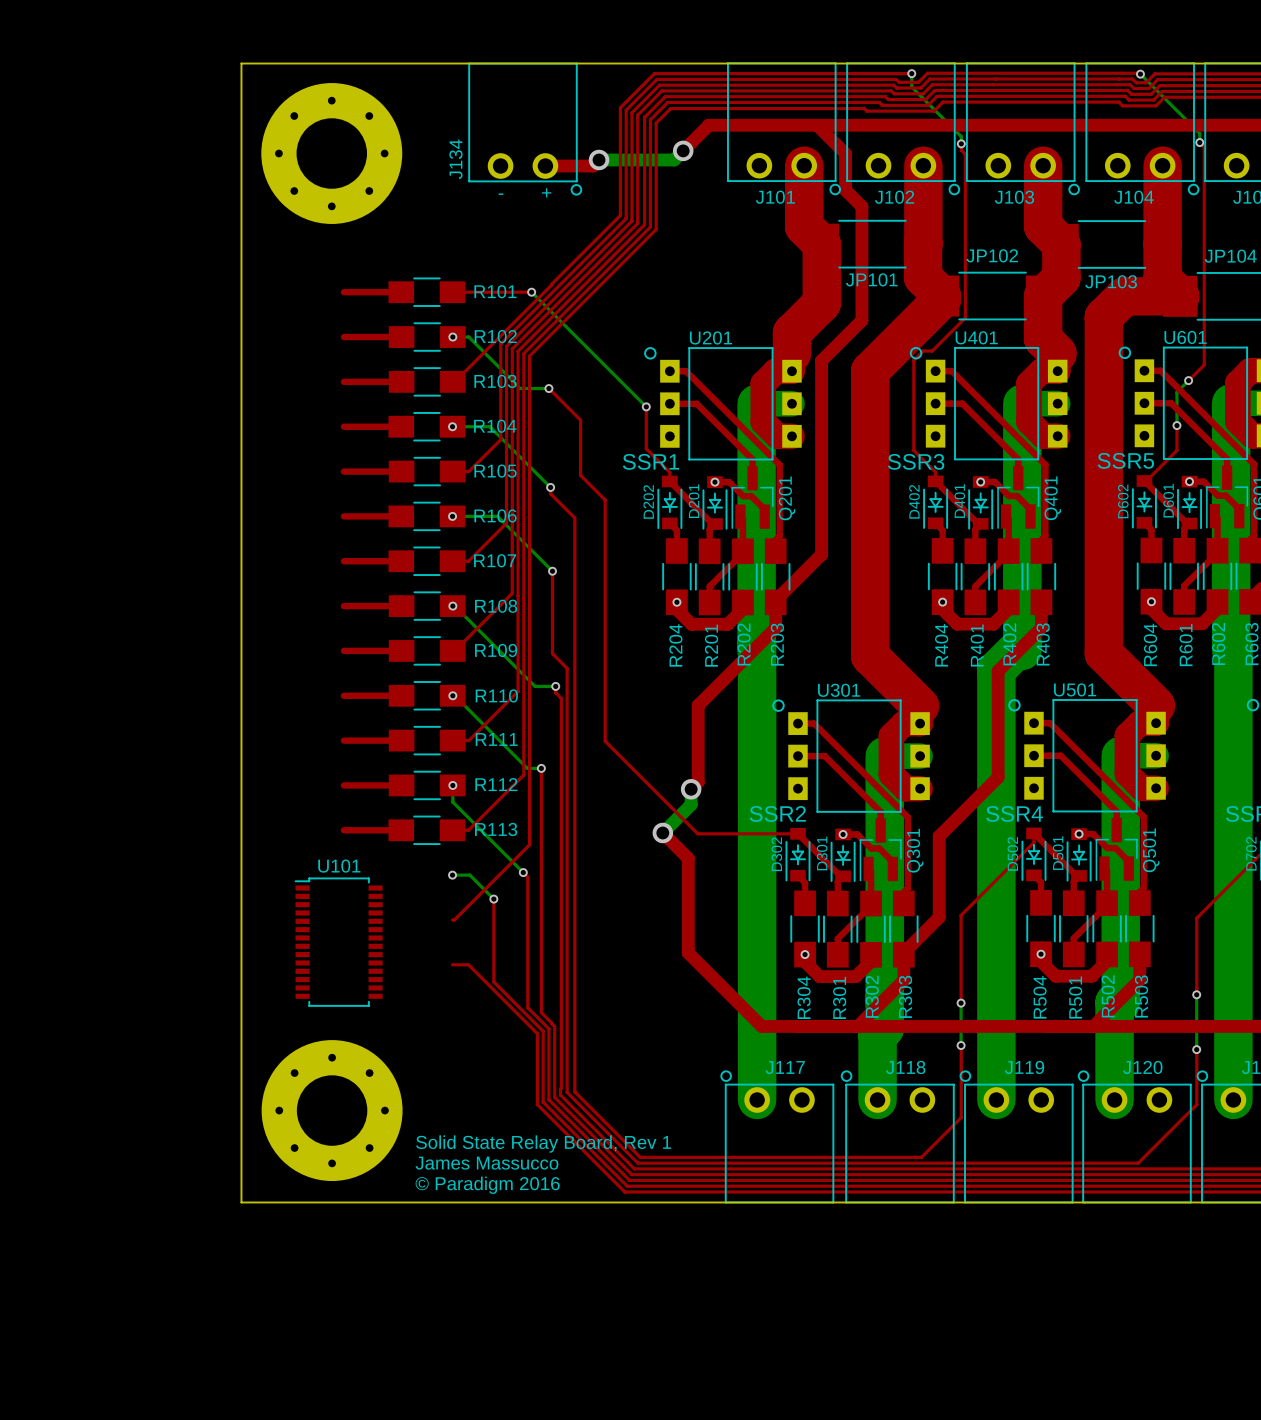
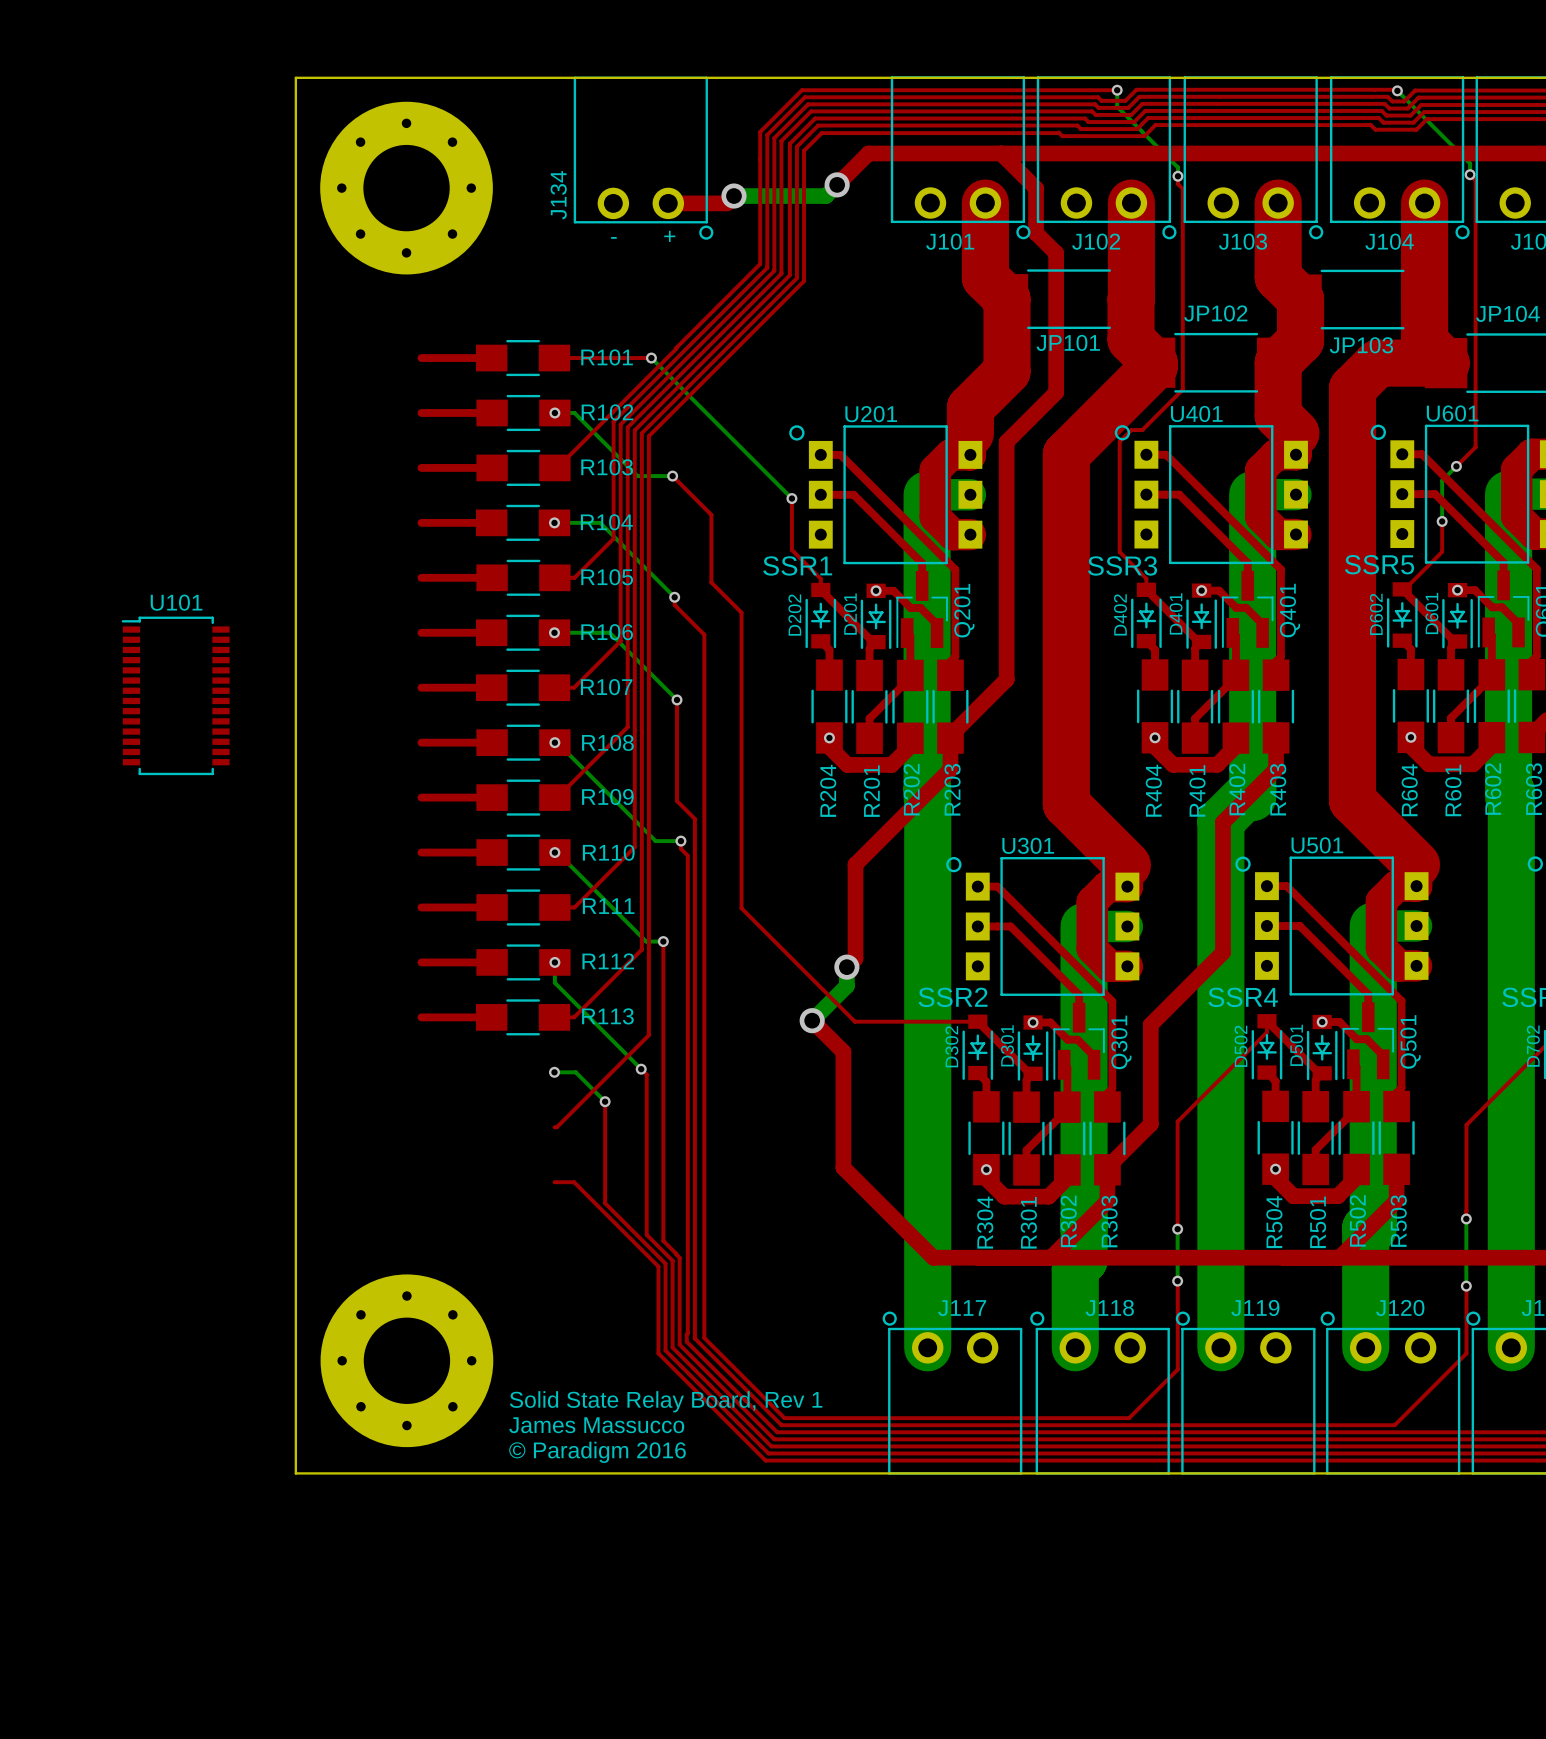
U101 position: (338, 942) -> (175, 695)

